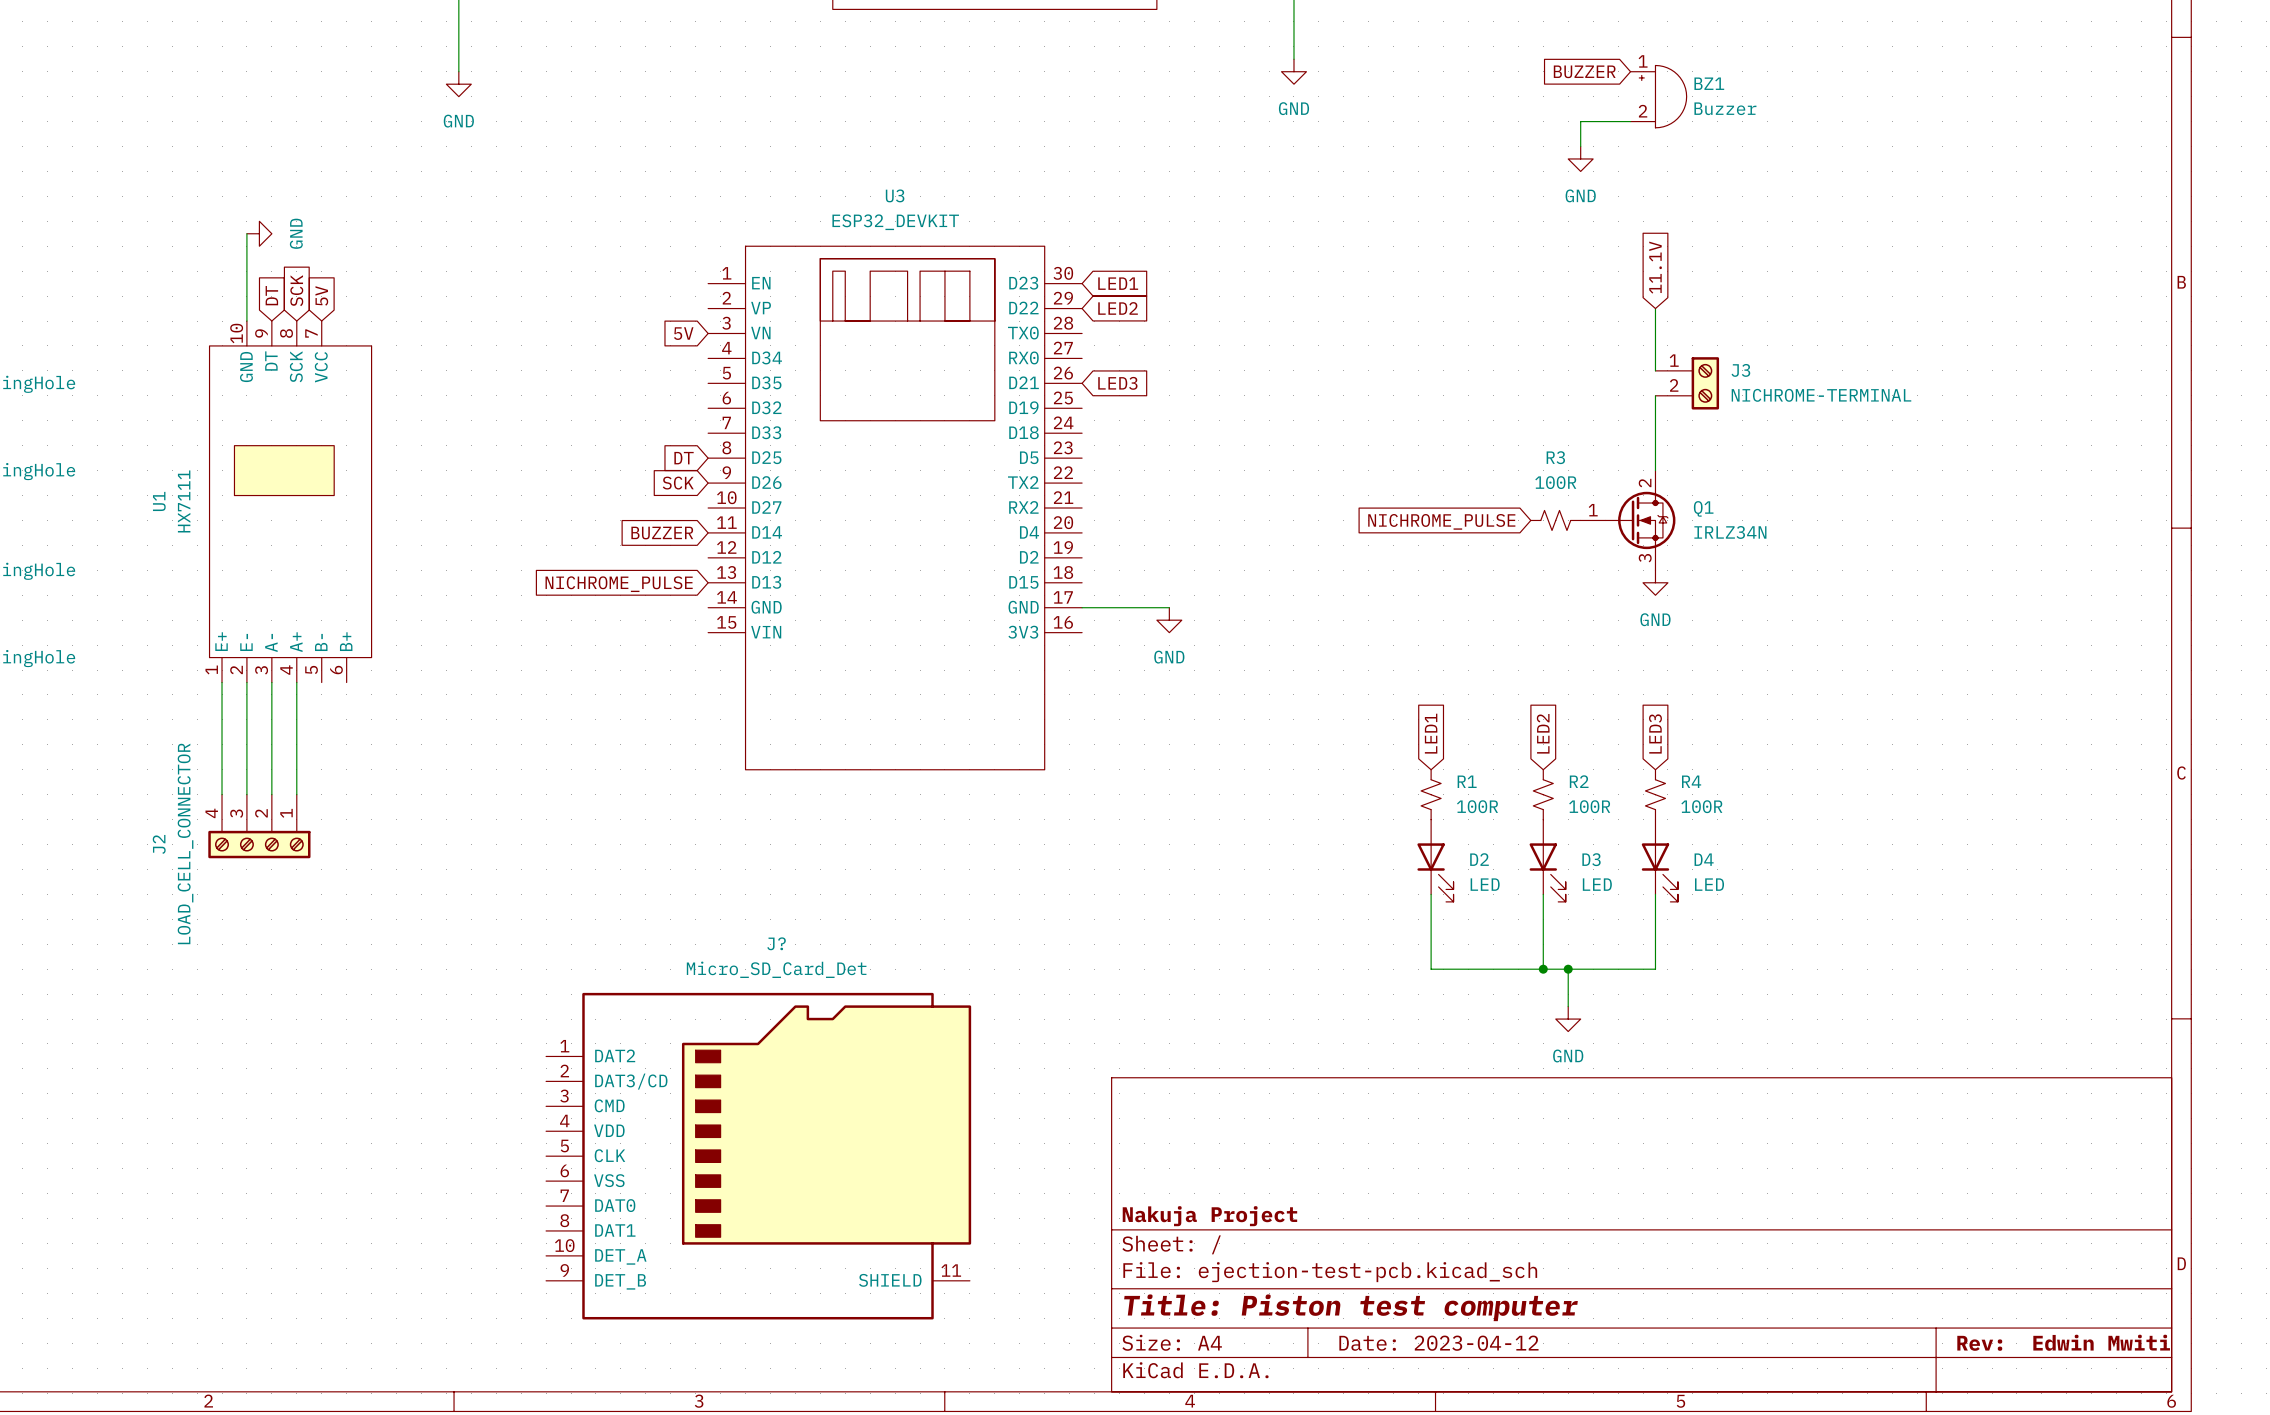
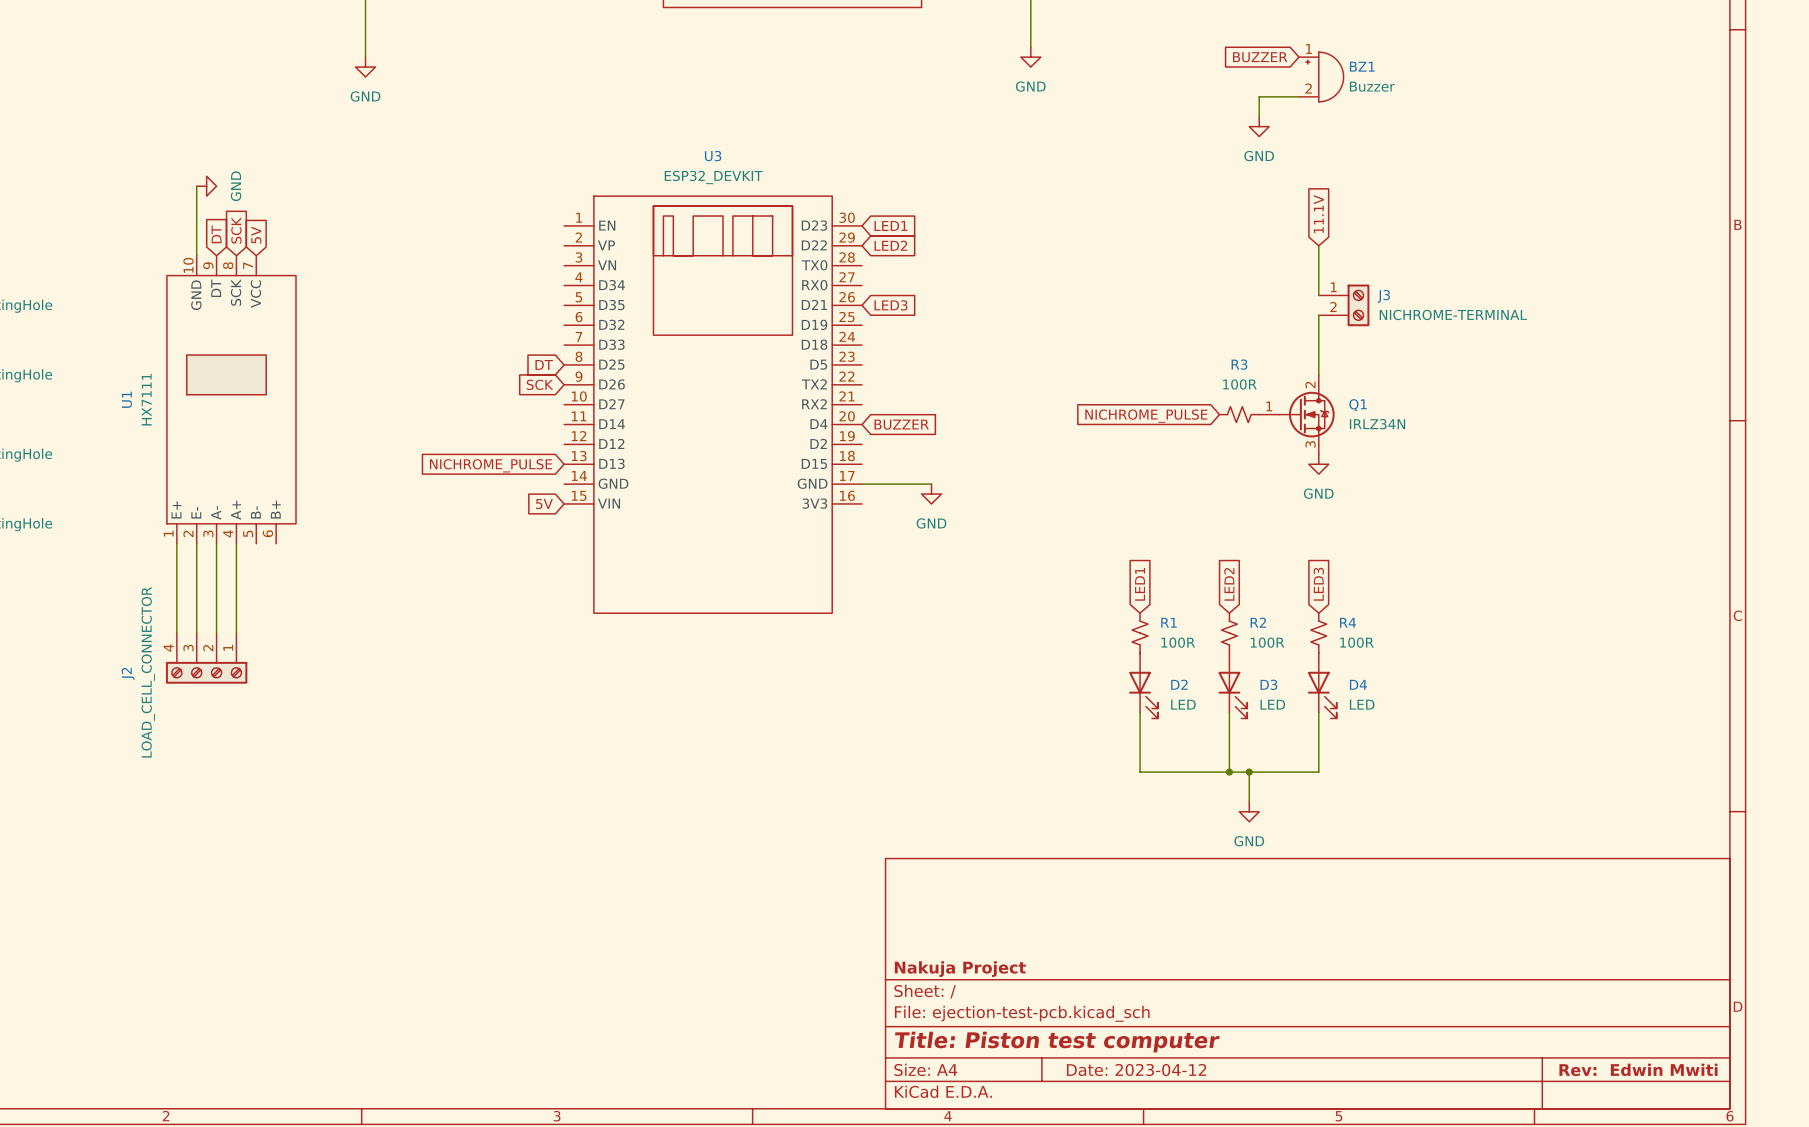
global label: 5V (683, 333) -> none
global label: BUZZER (662, 533) -> none
global label: none -> BUZZER (901, 424)
global label: none -> 5V (544, 504)
J?: Micro_SD_Card_Det (758, 1156) -> none

